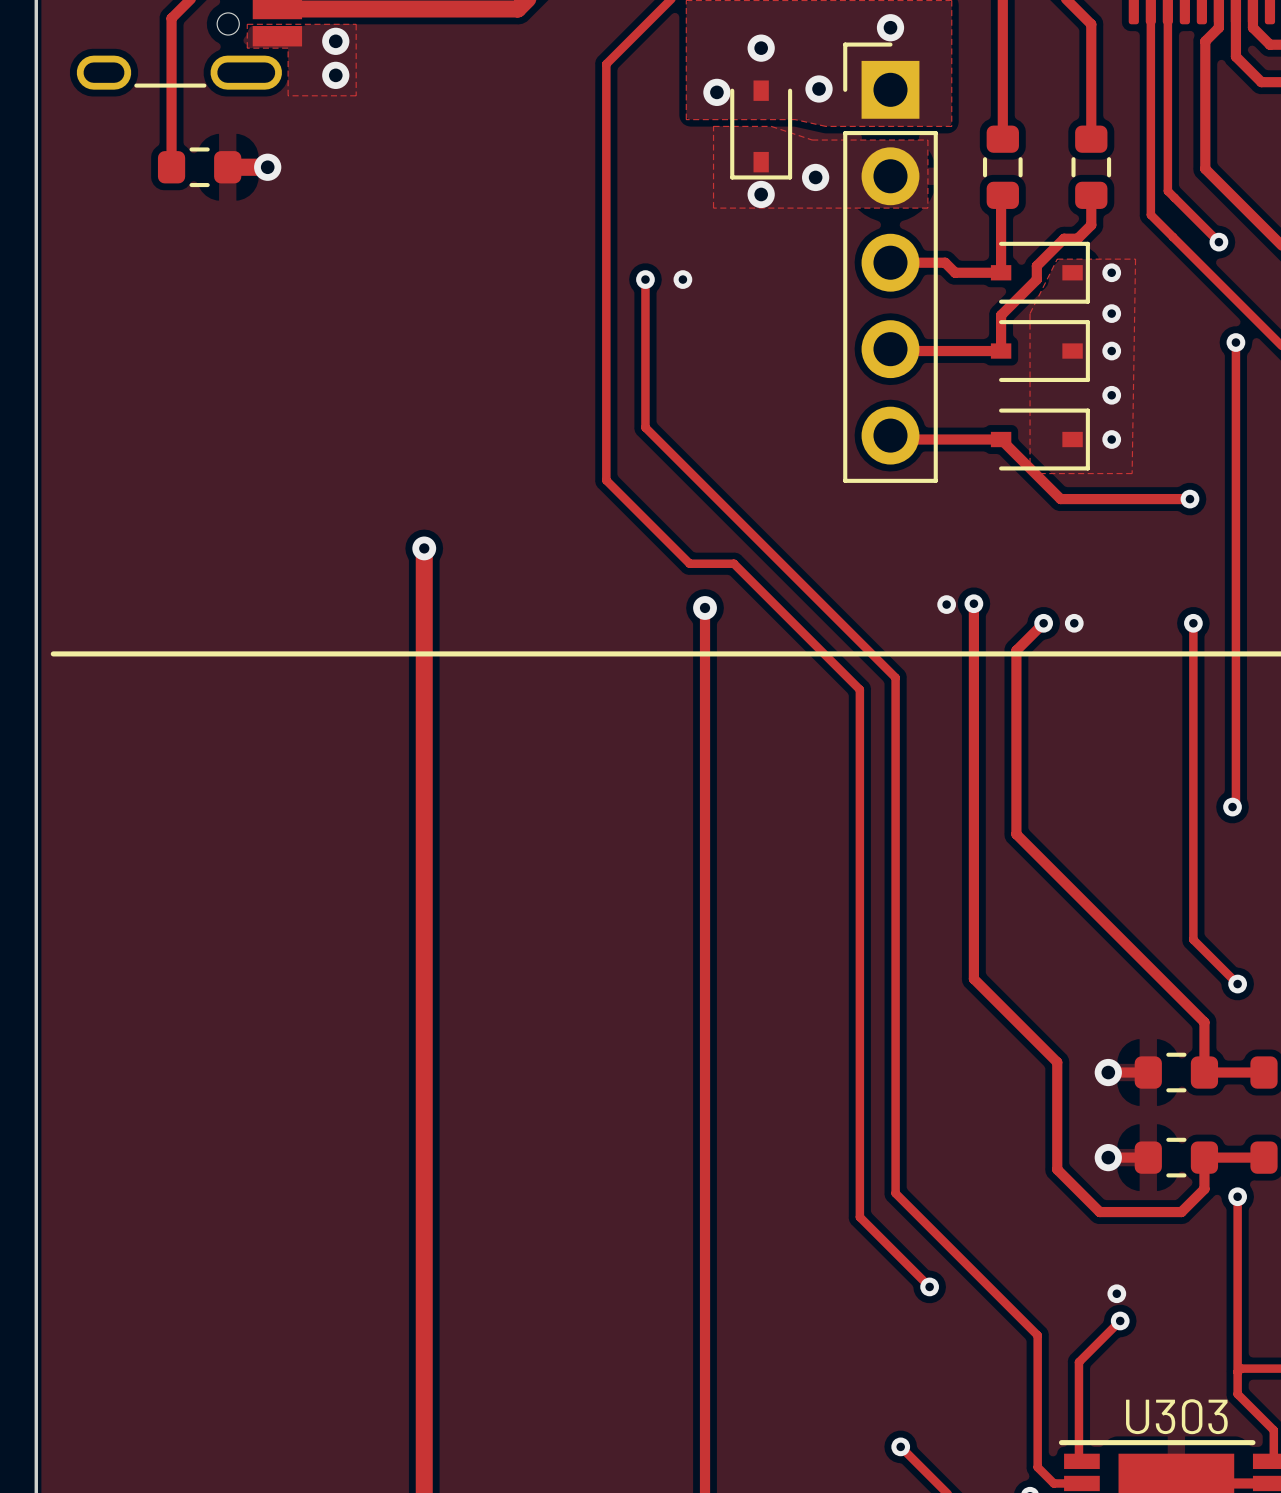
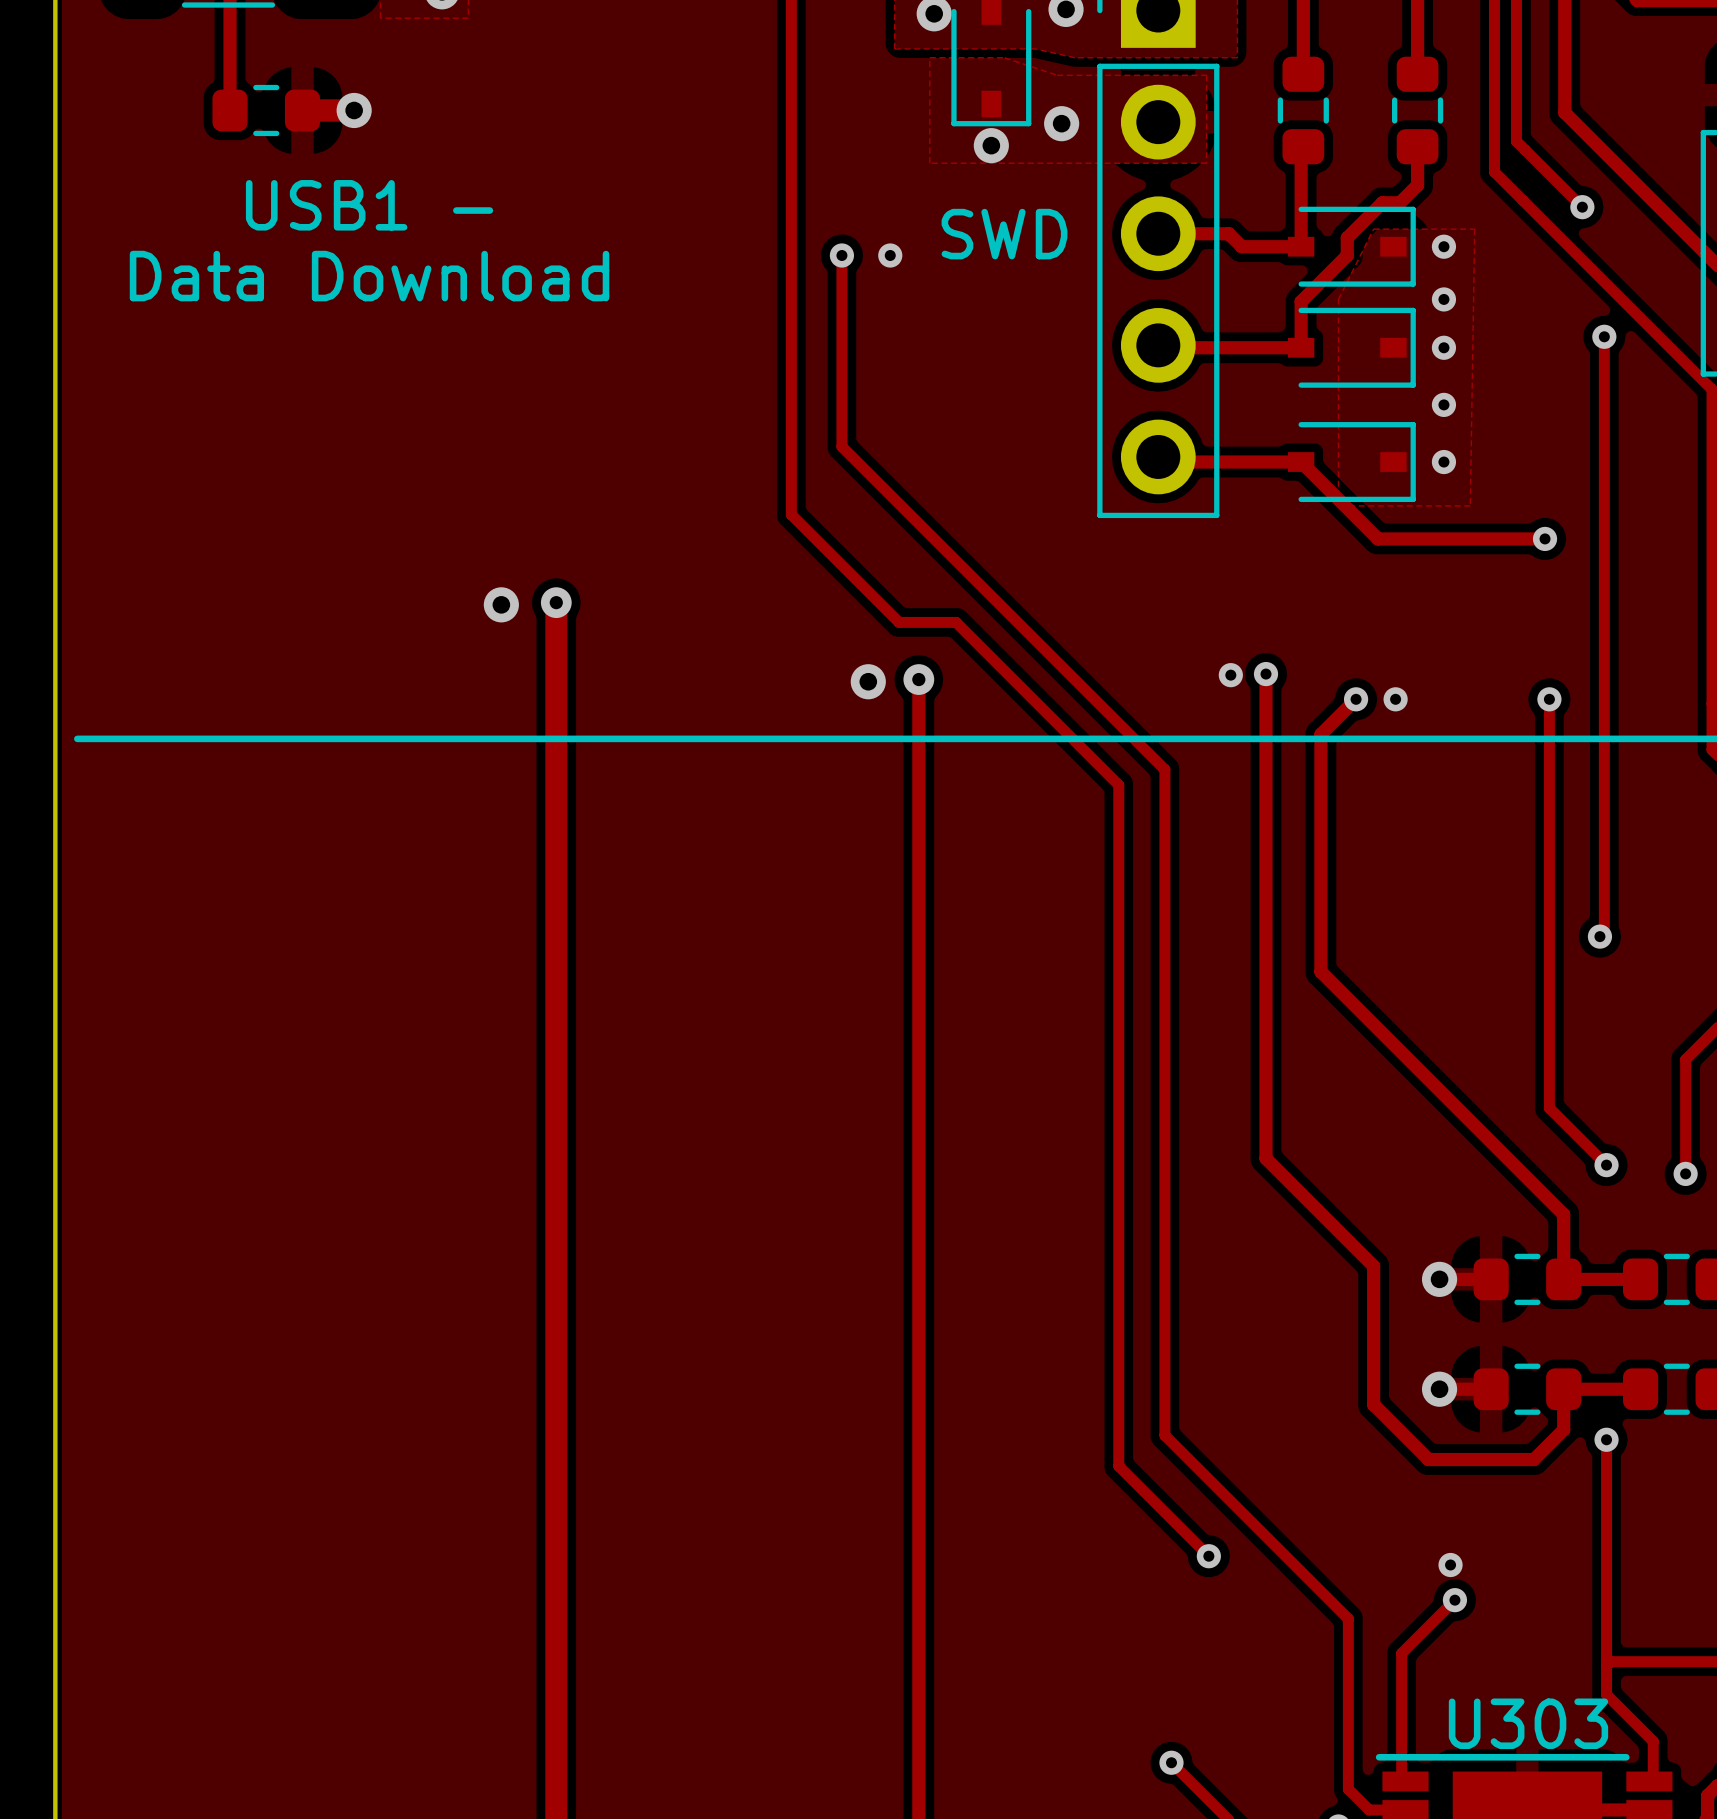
text: none -> USB1 - (369, 205)
text: none -> SWD (1004, 234)
text: none -> Data Download (369, 276)
via: none -> (501, 604)
via: none -> (868, 681)

